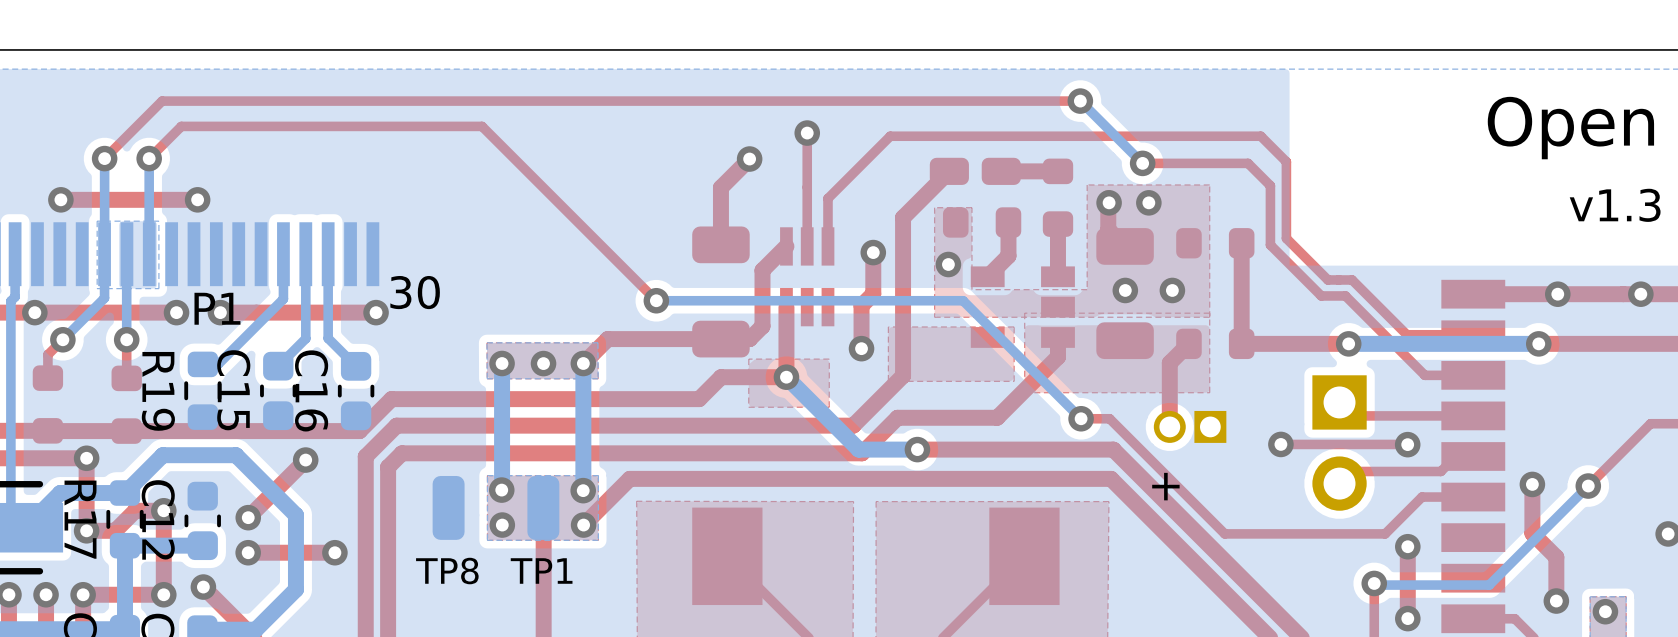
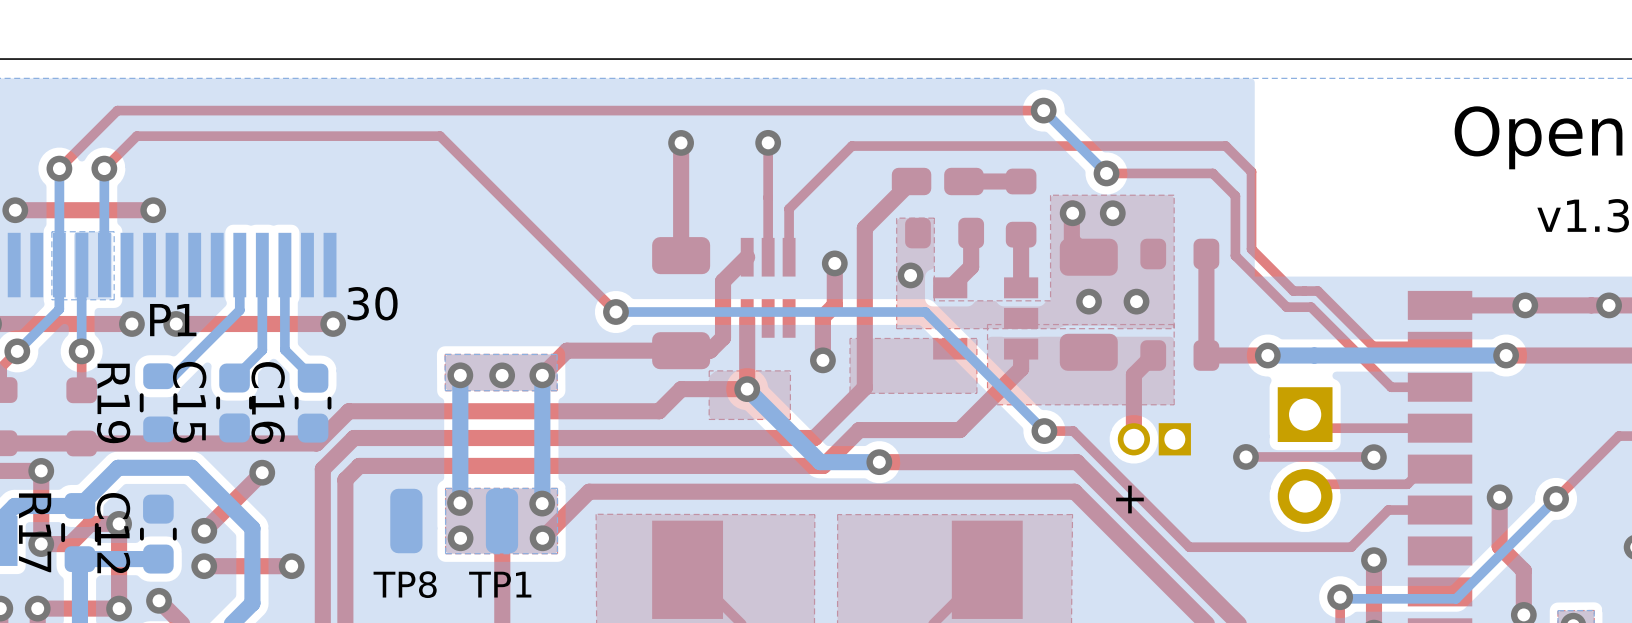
top track: (749, 159) (720, 187) -> (681, 142) (681, 197)
via position: (749, 159) -> (681, 142)
bottom track: none -> (1314, 355) (1267, 355)
top track: (1348, 343) (1302, 343) -> none
via position: (1348, 343) -> (1267, 355)

